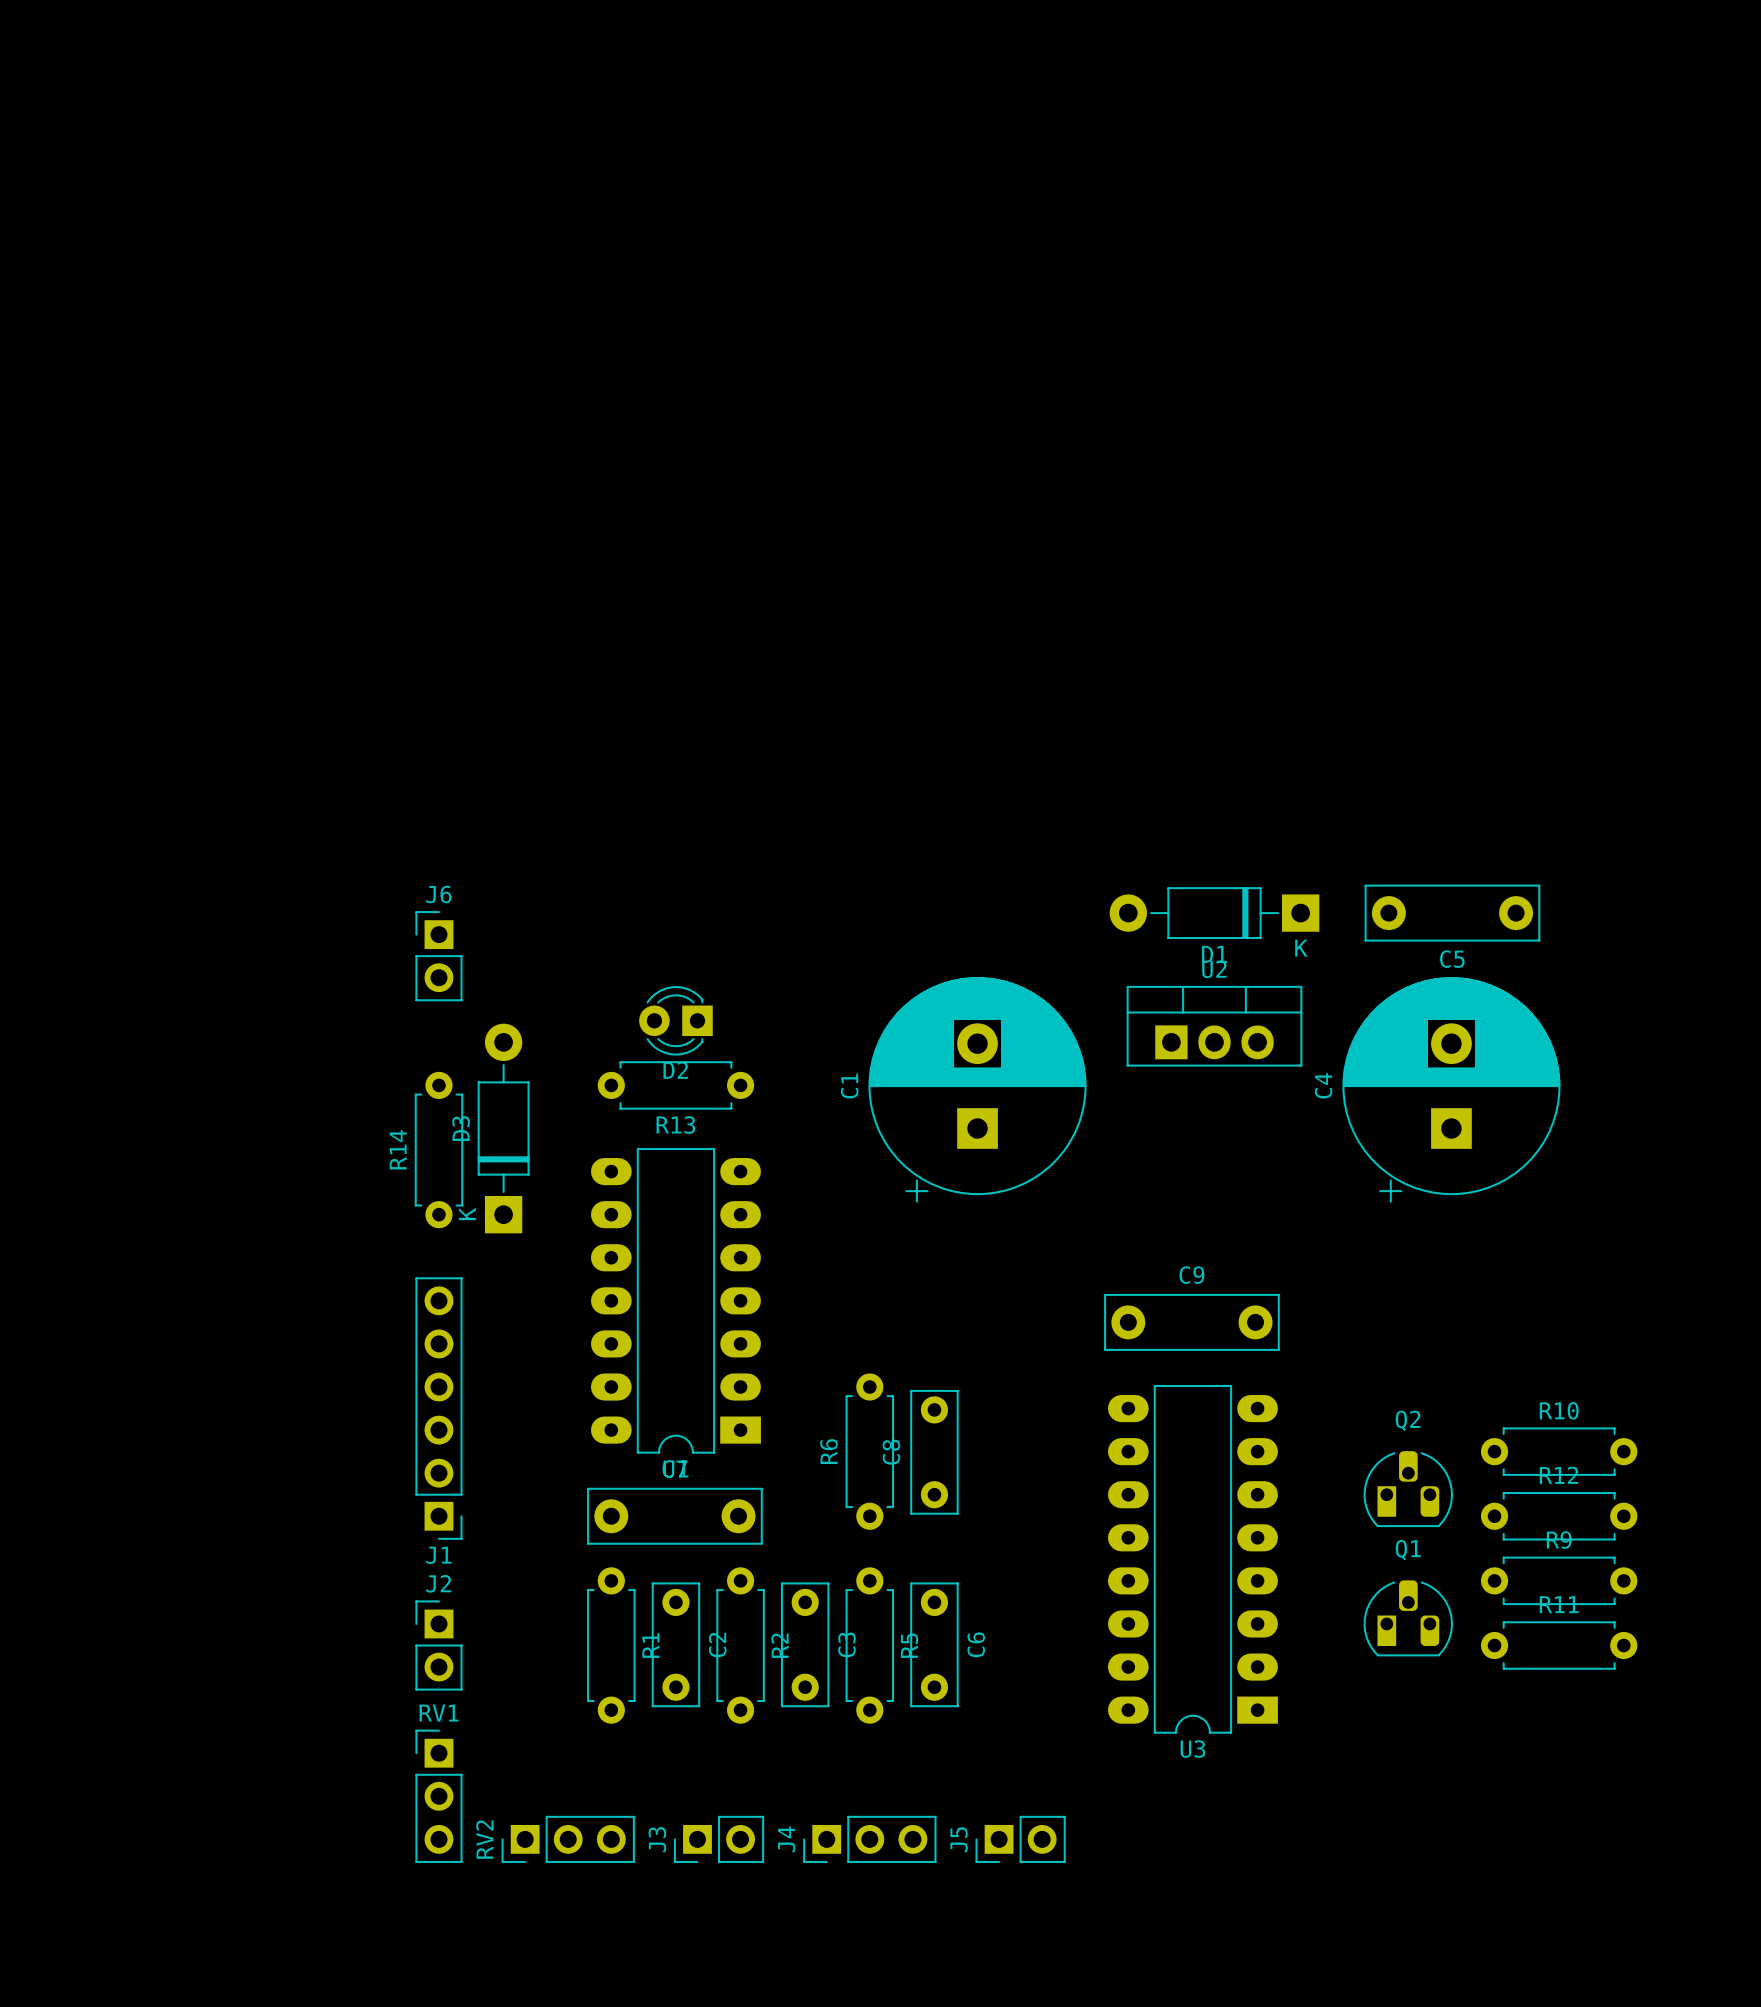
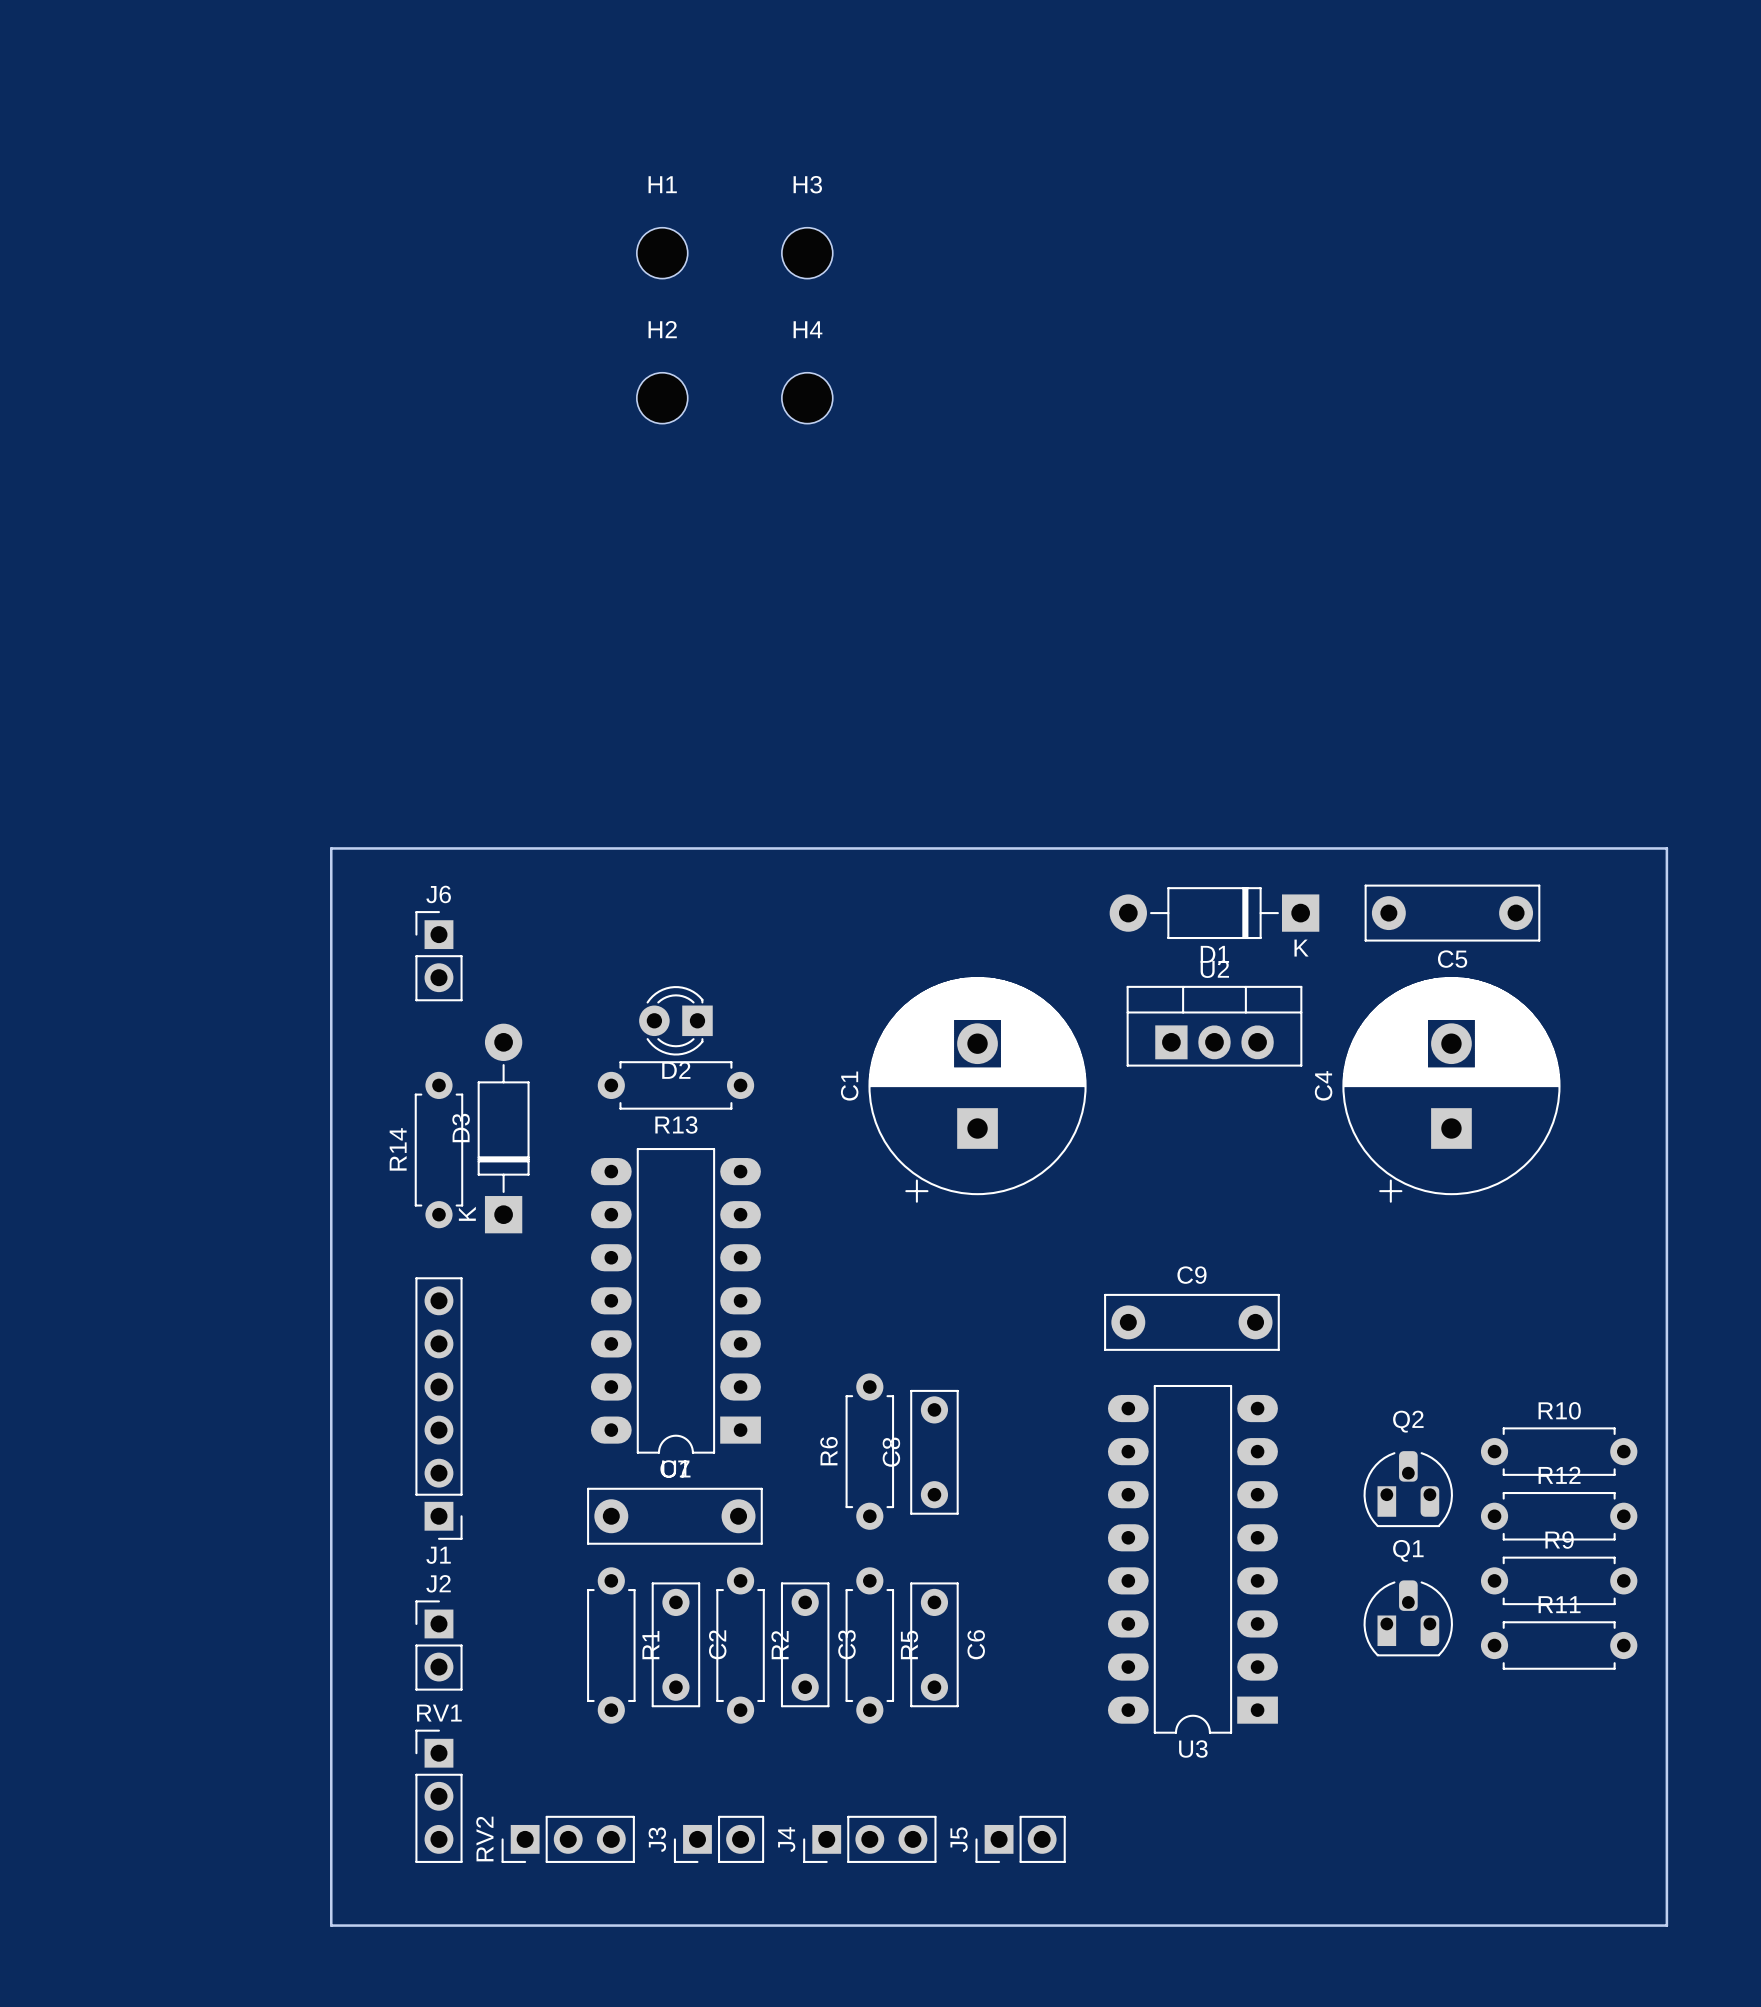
H1: none -> (662, 253)
H3: none -> (807, 253)
H2: none -> (662, 398)
H4: none -> (807, 398)
board edge: none -> (331, 848) (331, 1925) (1666, 1925) (1666, 848) (331, 848)

